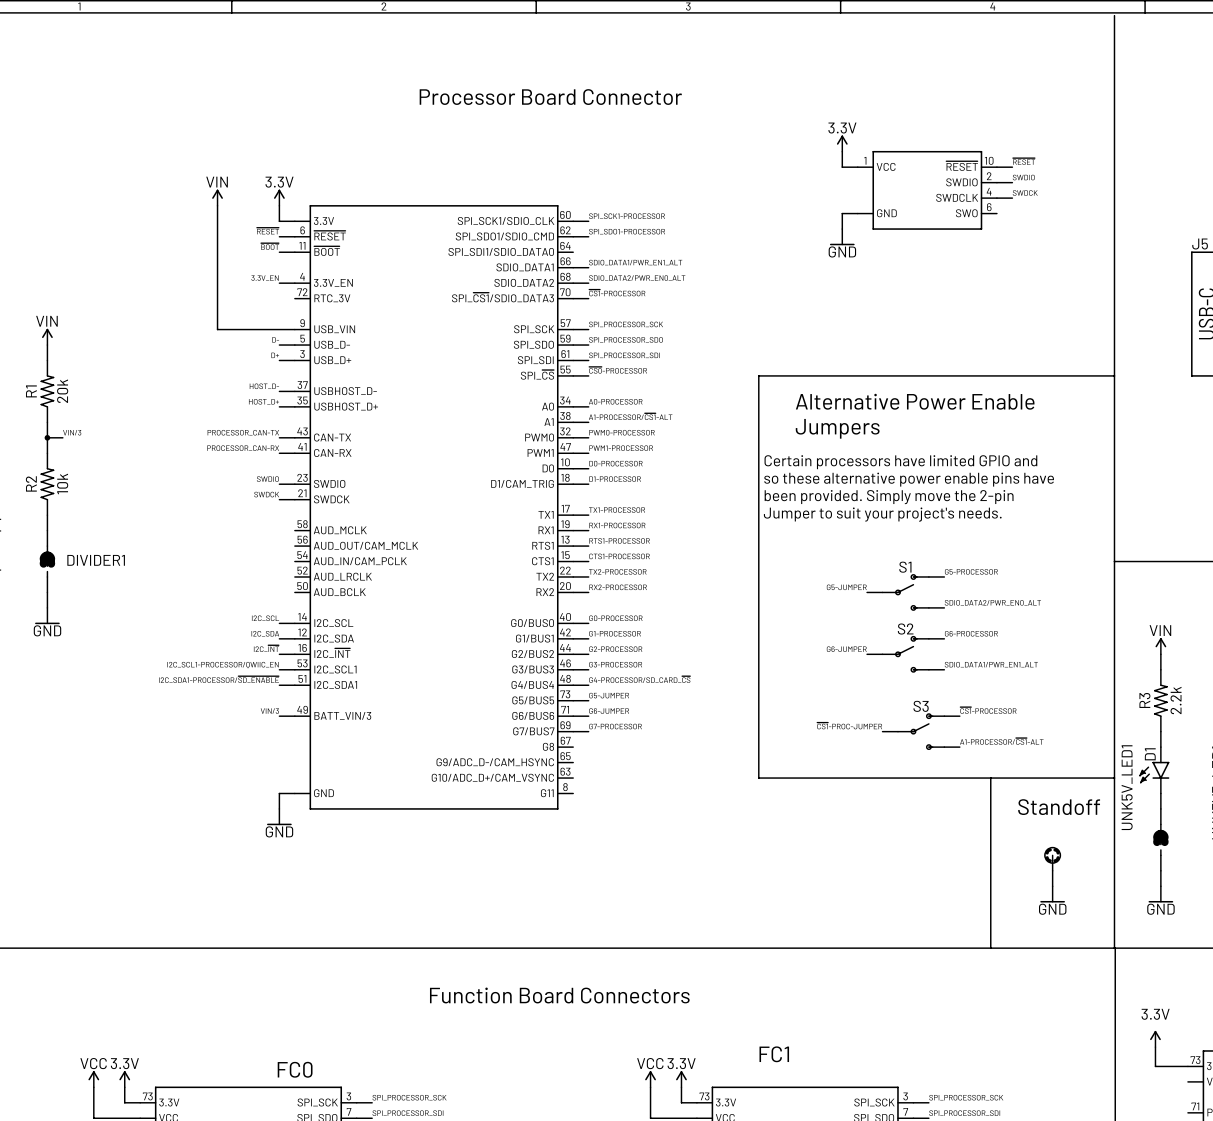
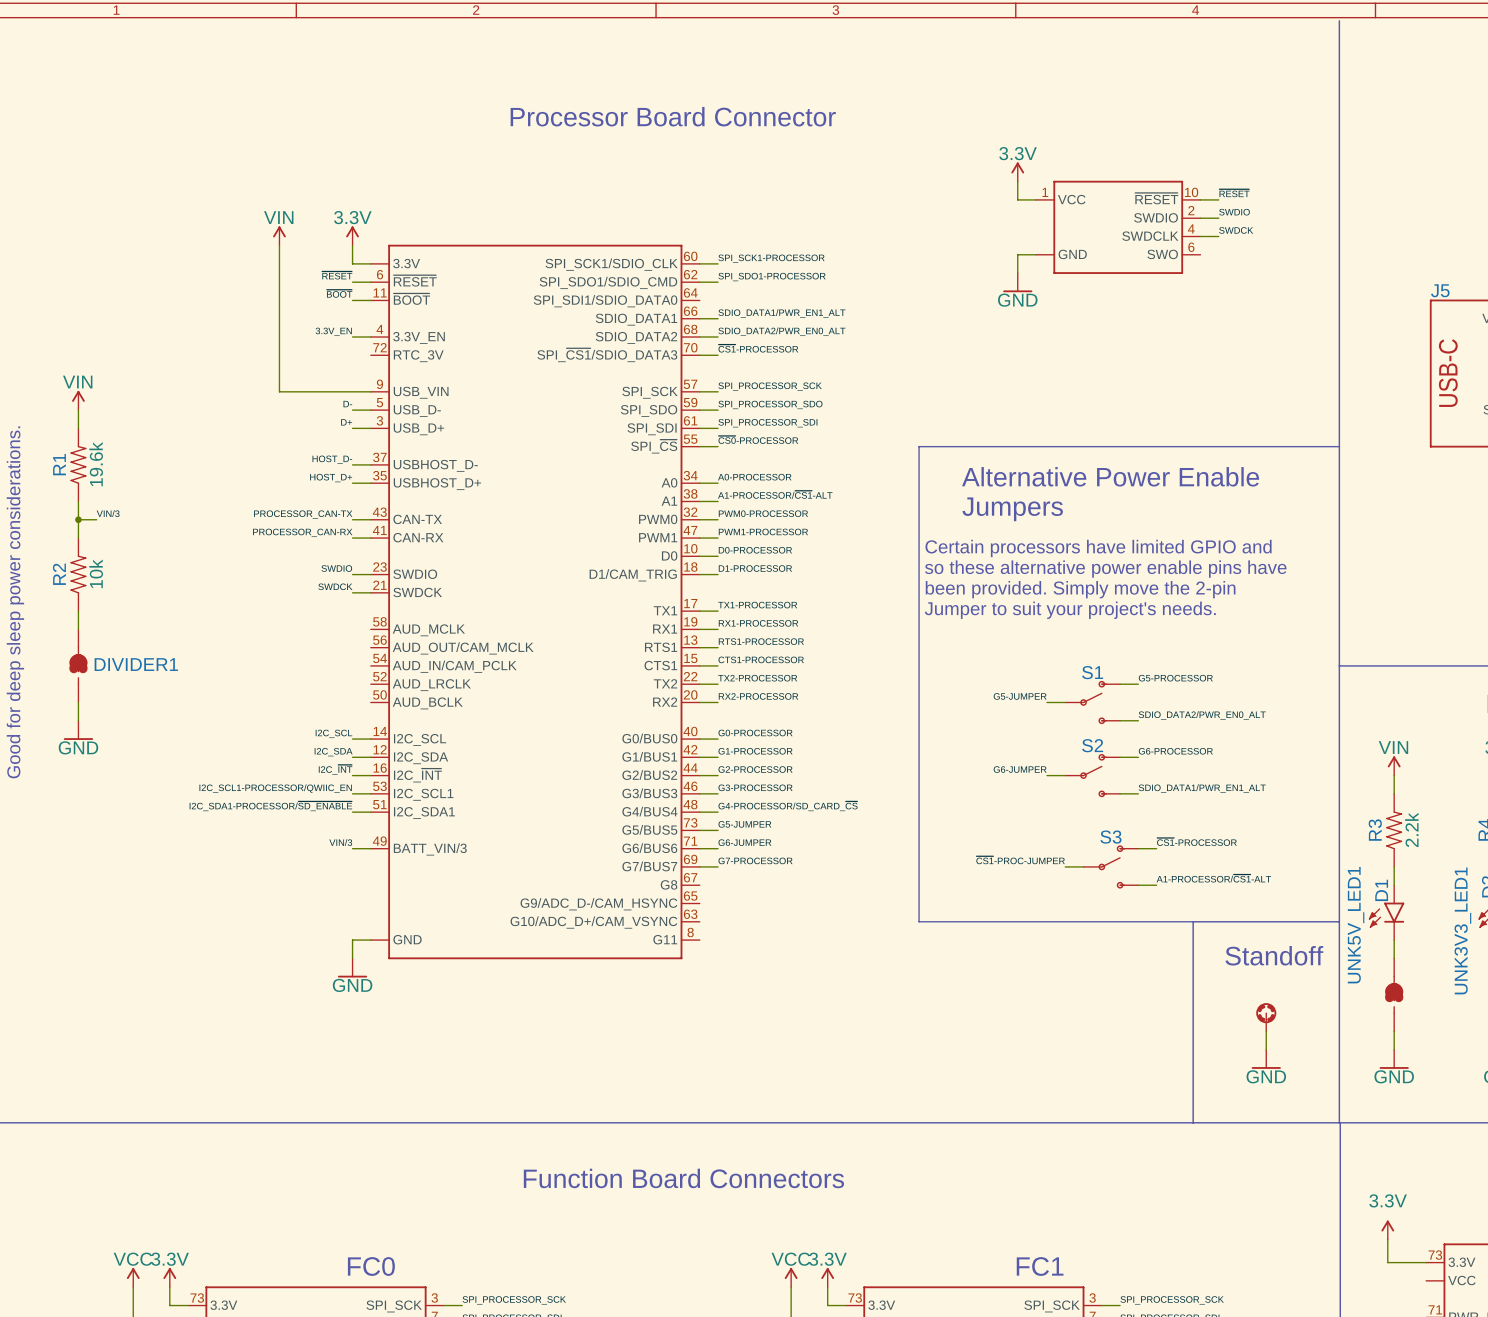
R1 value: 20k (62, 391) -> 19.6k (96, 464)
text position: FC1 (774, 1054) -> FC1 (1040, 1266)

